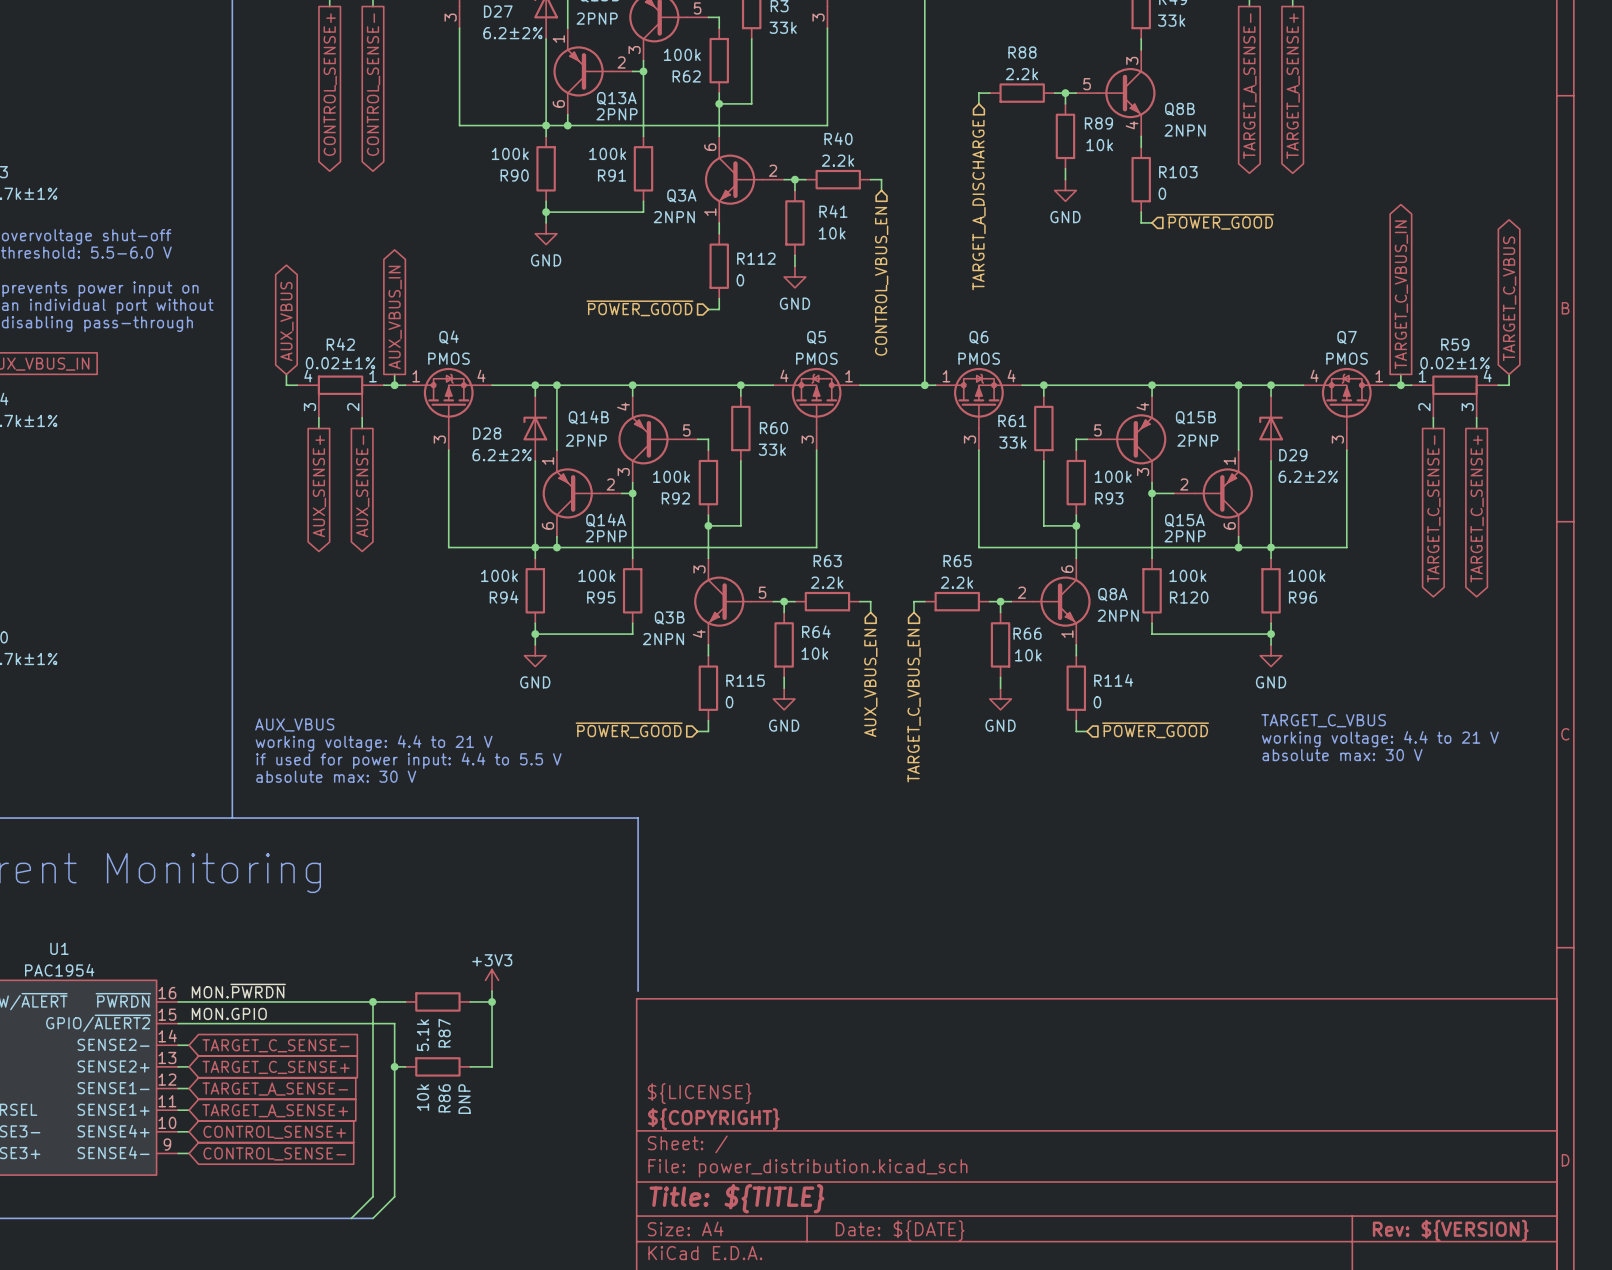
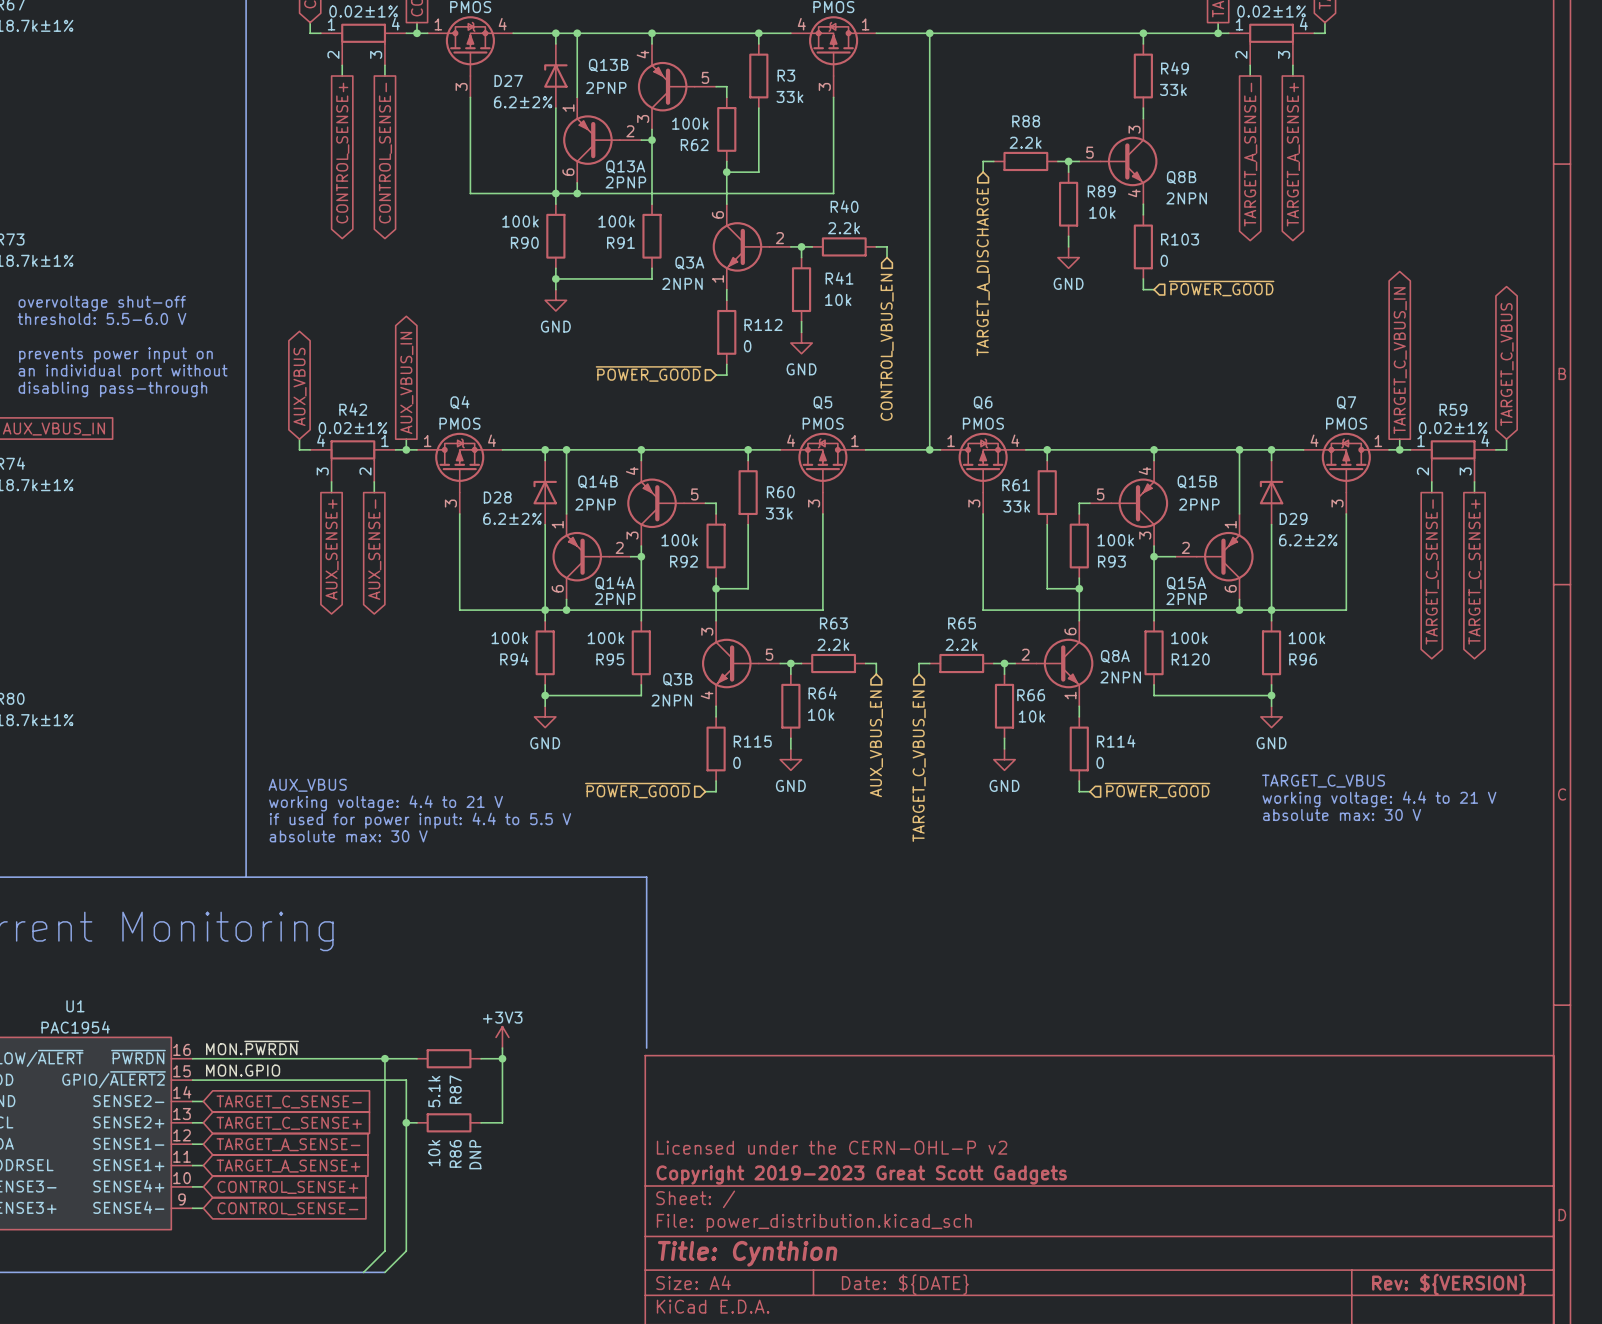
title block: ${LICENSE} (699, 1093) -> Licensed under the CERN-OHL-P v2 (832, 1147)
title block: ${COPYRIGHT} (713, 1119) -> Copyright 2019-2023 Great Scott Gadgets (861, 1175)
title block: Title: ${TITLE} (736, 1198) -> Title: Cynthion (747, 1253)

